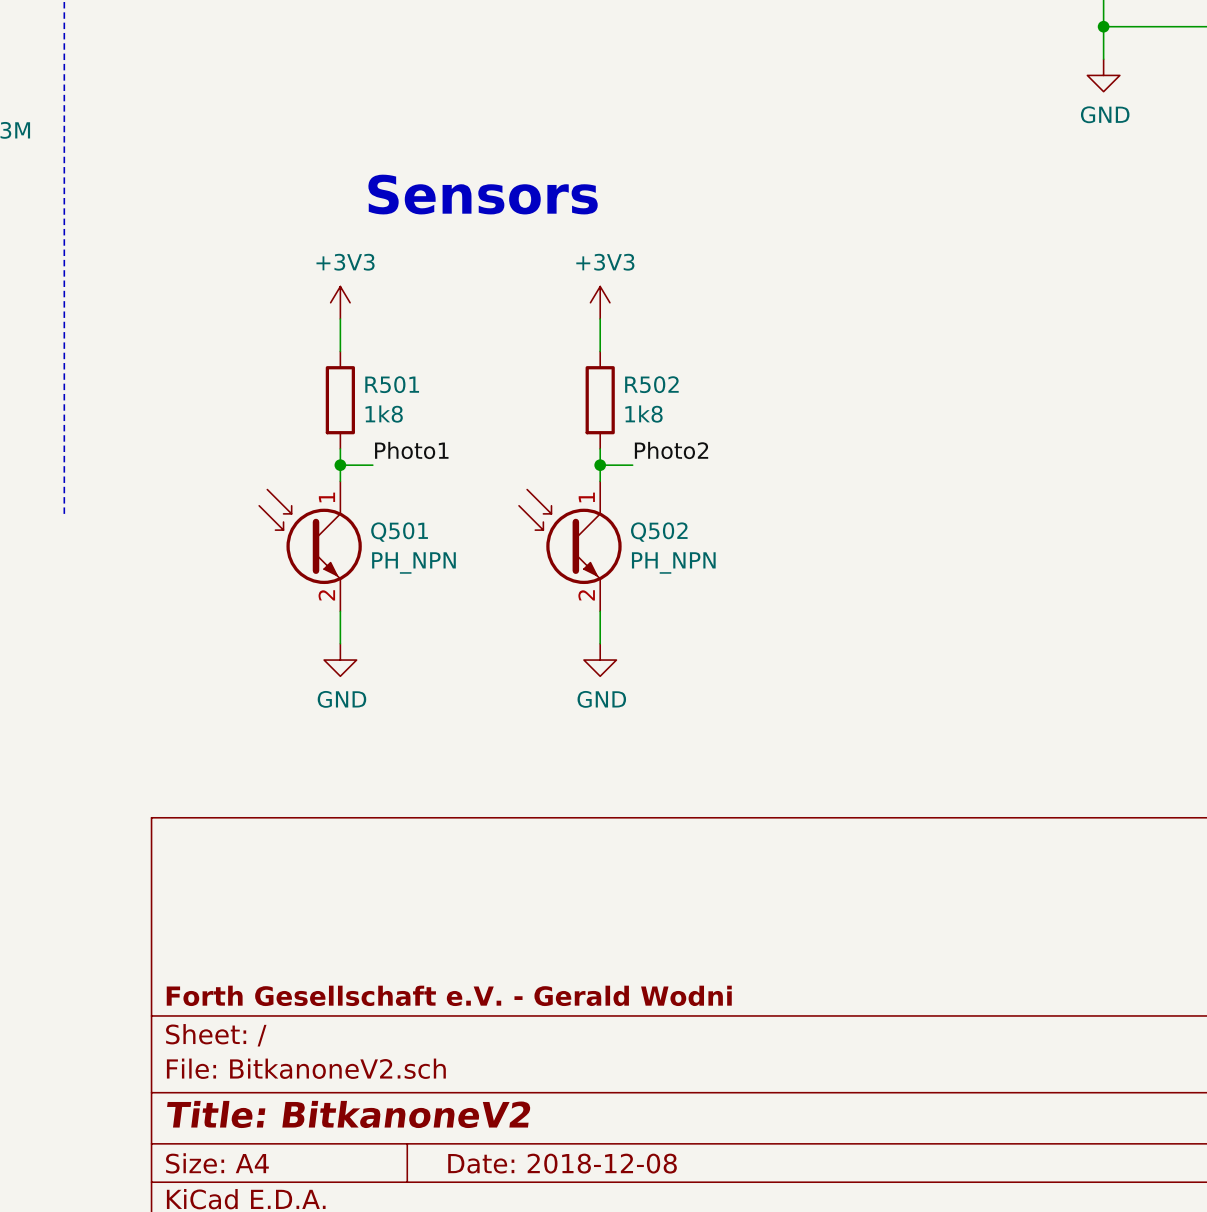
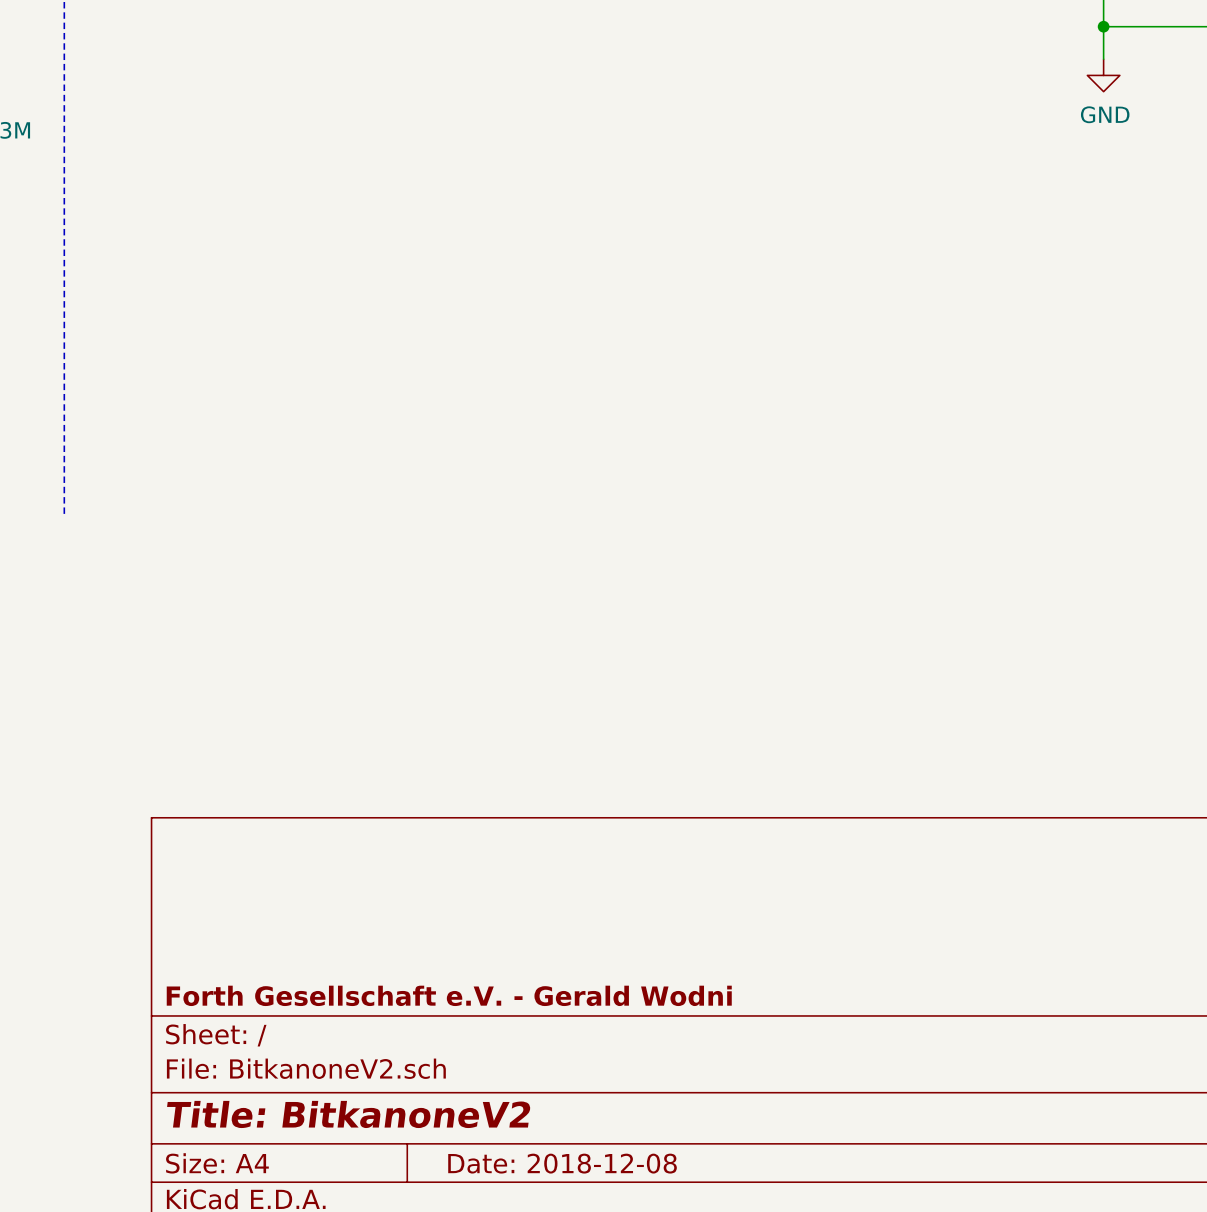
text: Sensors (483, 194) -> none
power symbol: +3V3 (340, 302) -> none
power symbol: +3V3 (600, 302) -> none
wire: (340, 319) (340, 351) -> none
wire: (600, 319) (600, 351) -> none
R501: 1k8 (340, 400) -> none
R502: 1k8 (600, 400) -> none
wire: (340, 448) (340, 481) -> none
wire: (600, 448) (600, 481) -> none
label: Photo1 (411, 450) -> none
label: Photo2 (671, 450) -> none
wire: (340, 465) (372, 465) -> none
junction: (340, 465) -> none
wire: (600, 465) (632, 465) -> none
junction: (600, 465) -> none
Q501: PH_NPN (310, 546) -> none
Q502: PH_NPN (570, 546) -> none
wire: (340, 611) (340, 643) -> none
wire: (600, 611) (600, 643) -> none
power symbol: GND (340, 660) -> none
power symbol: GND (600, 660) -> none

